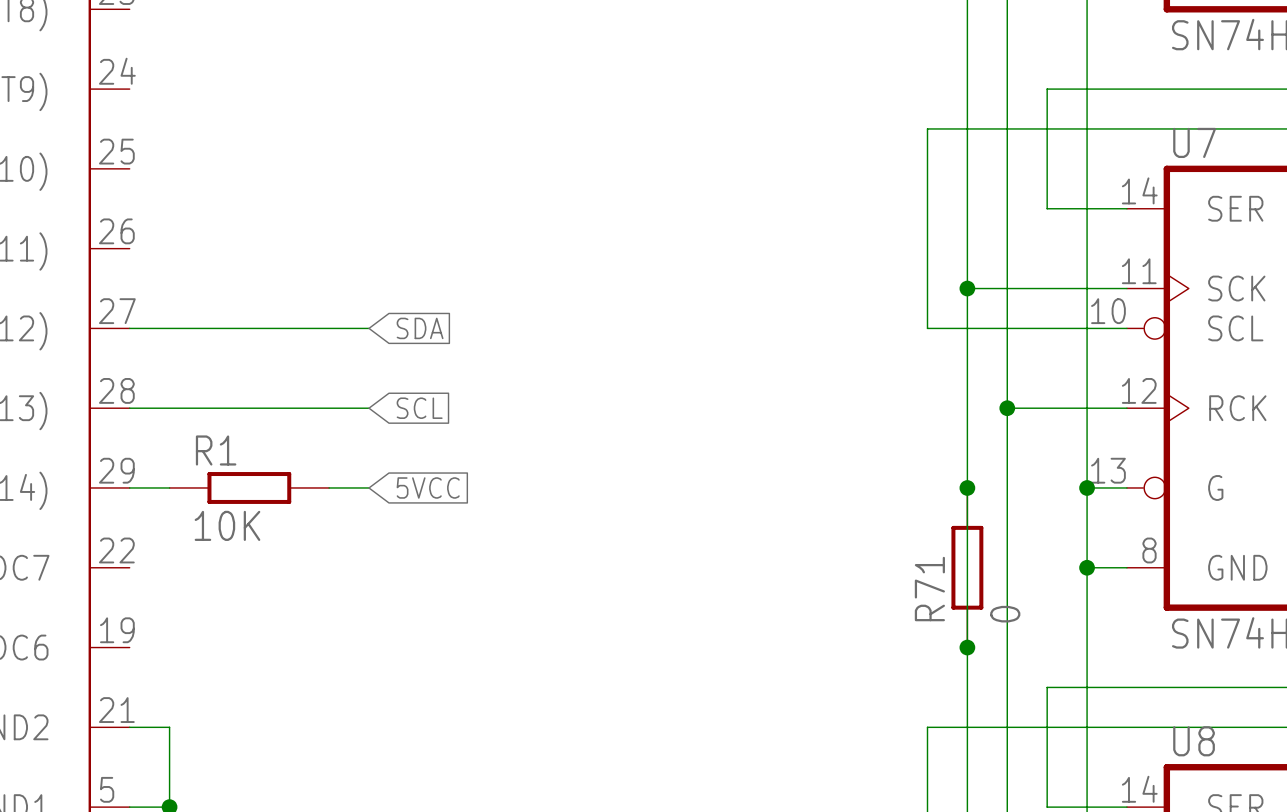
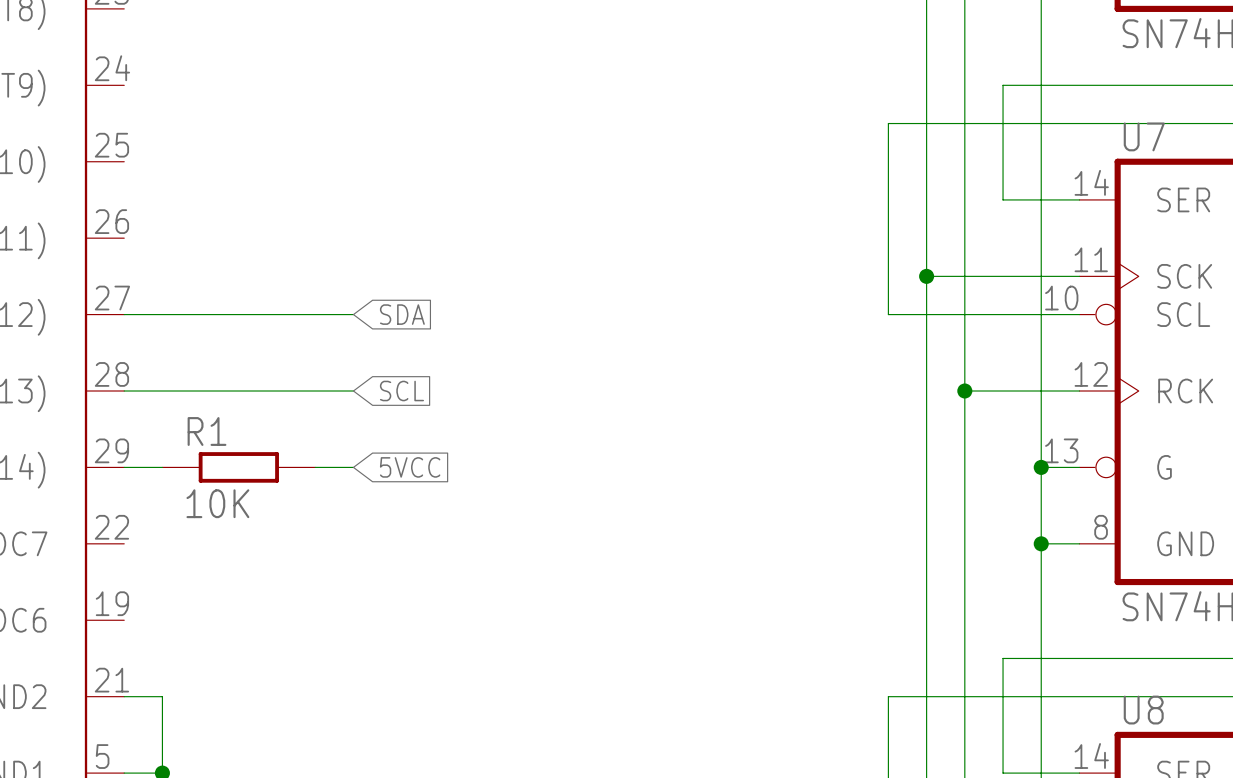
junction: (967, 487) -> none
R71: 0 (967, 567) -> none
junction: (967, 647) -> none

